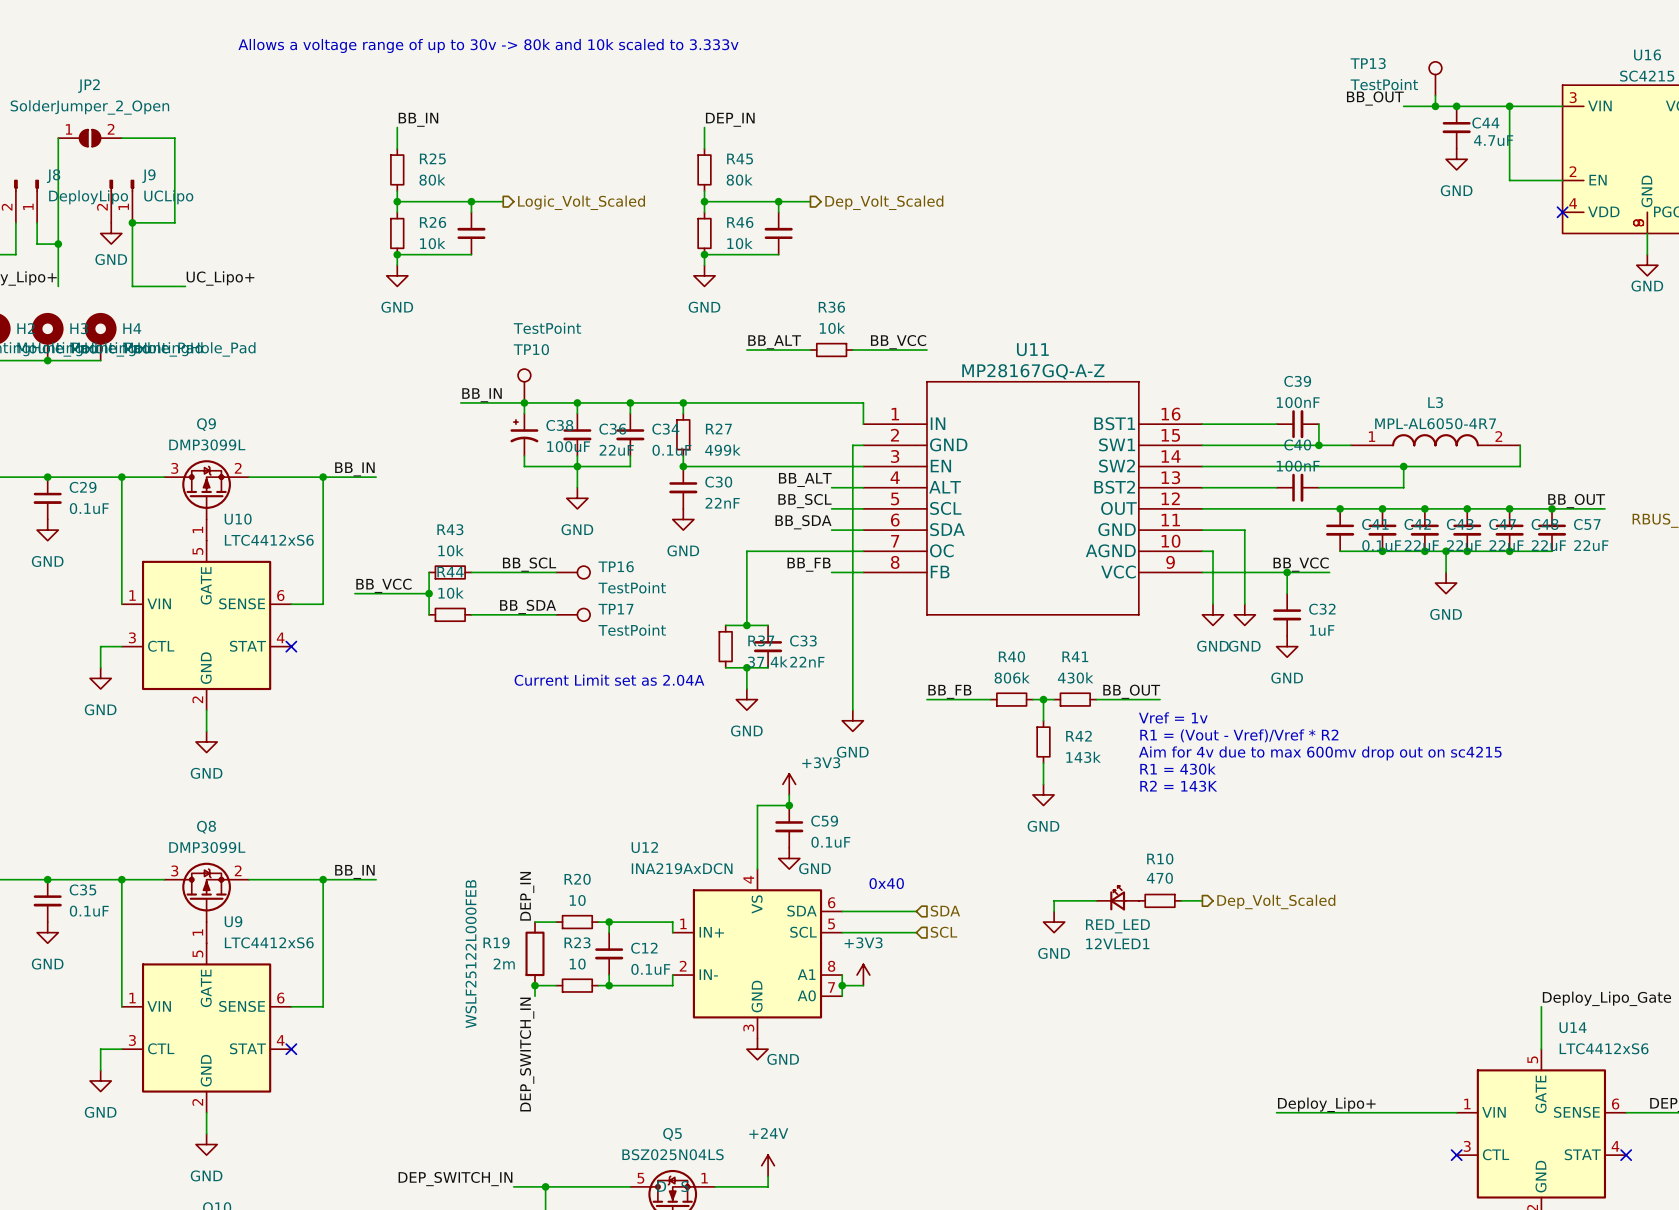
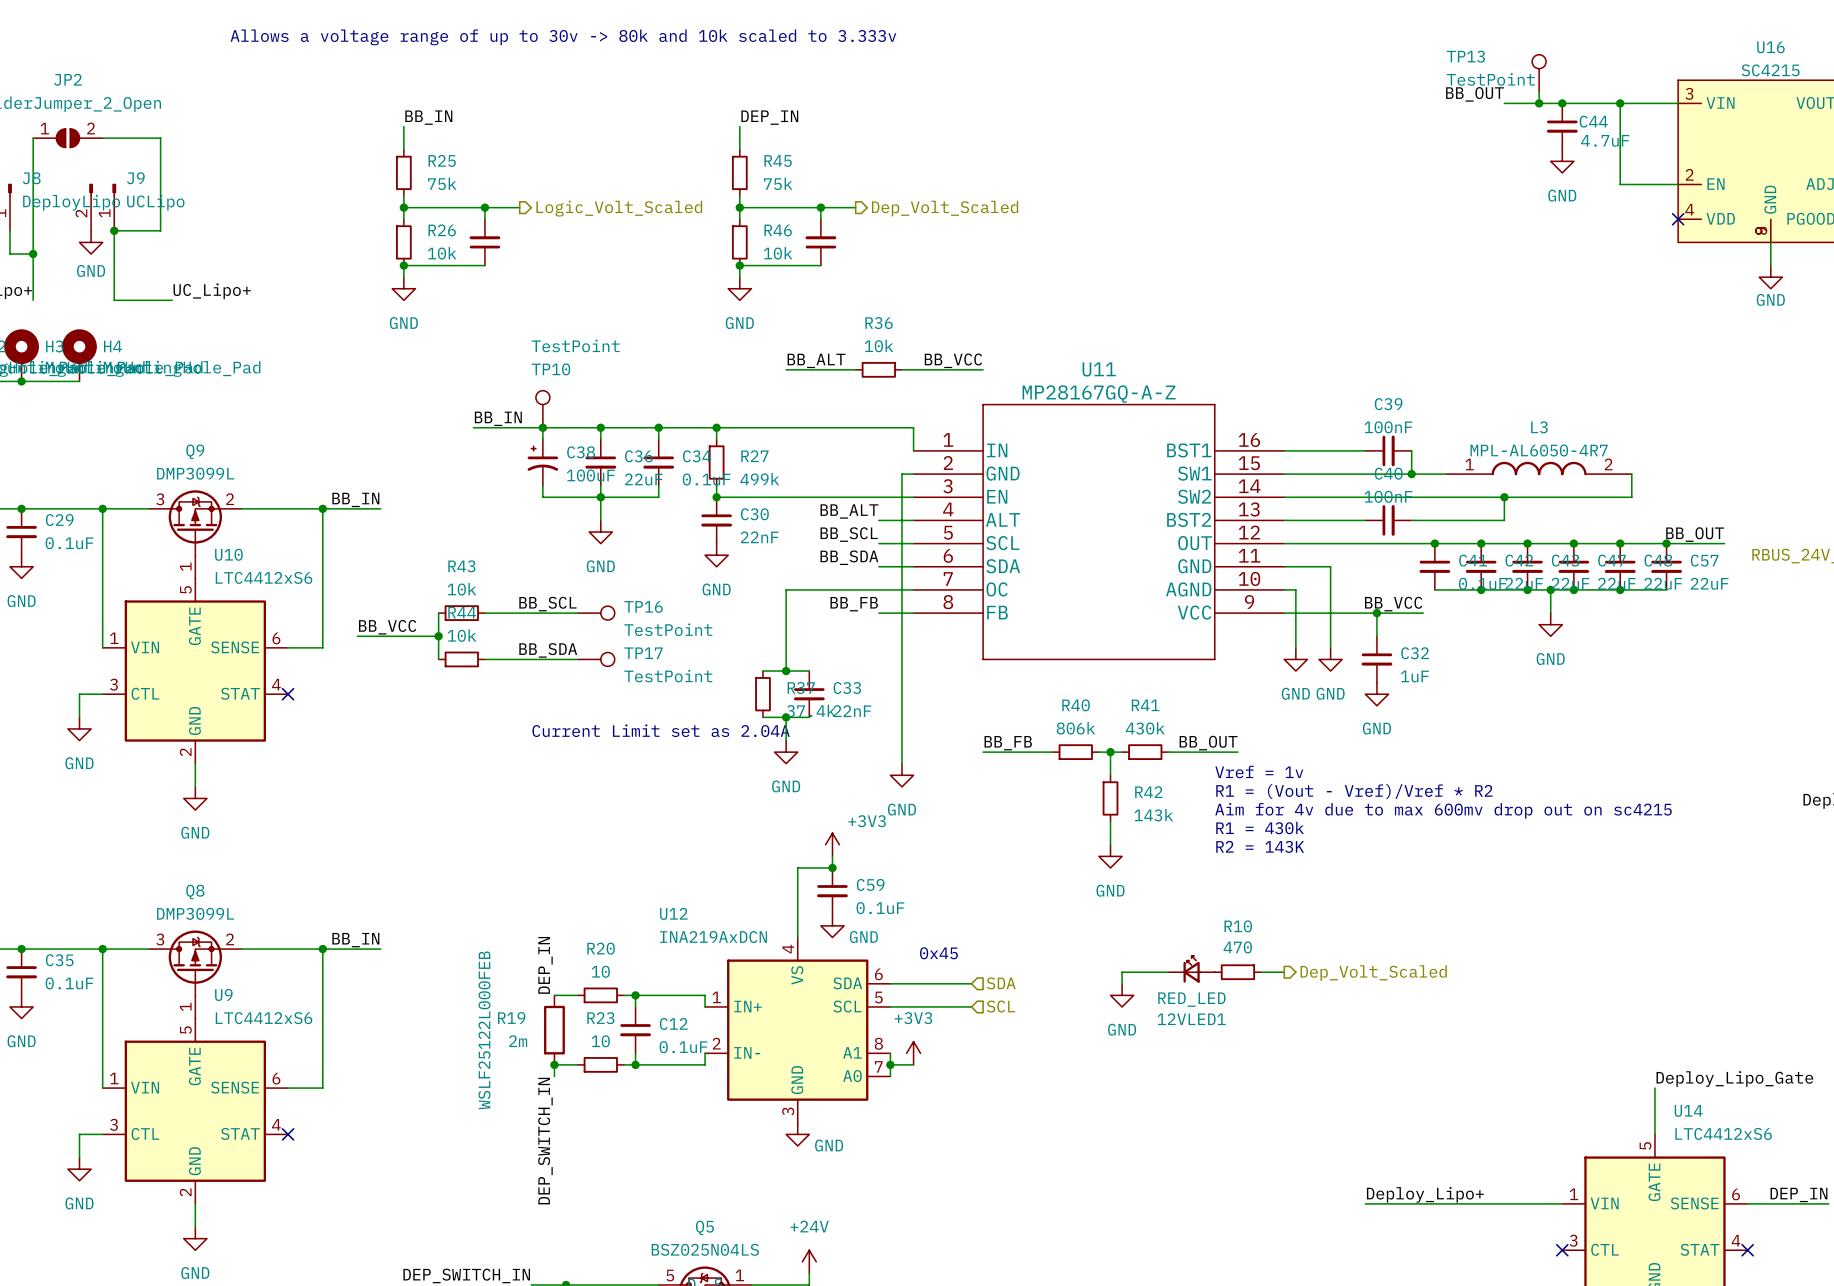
R25 value: 80k (432, 179) -> 75k (442, 183)
R45 value: 80k (739, 179) -> 75k (778, 183)
text: 0x40 (886, 883) -> 0x45 (938, 953)

